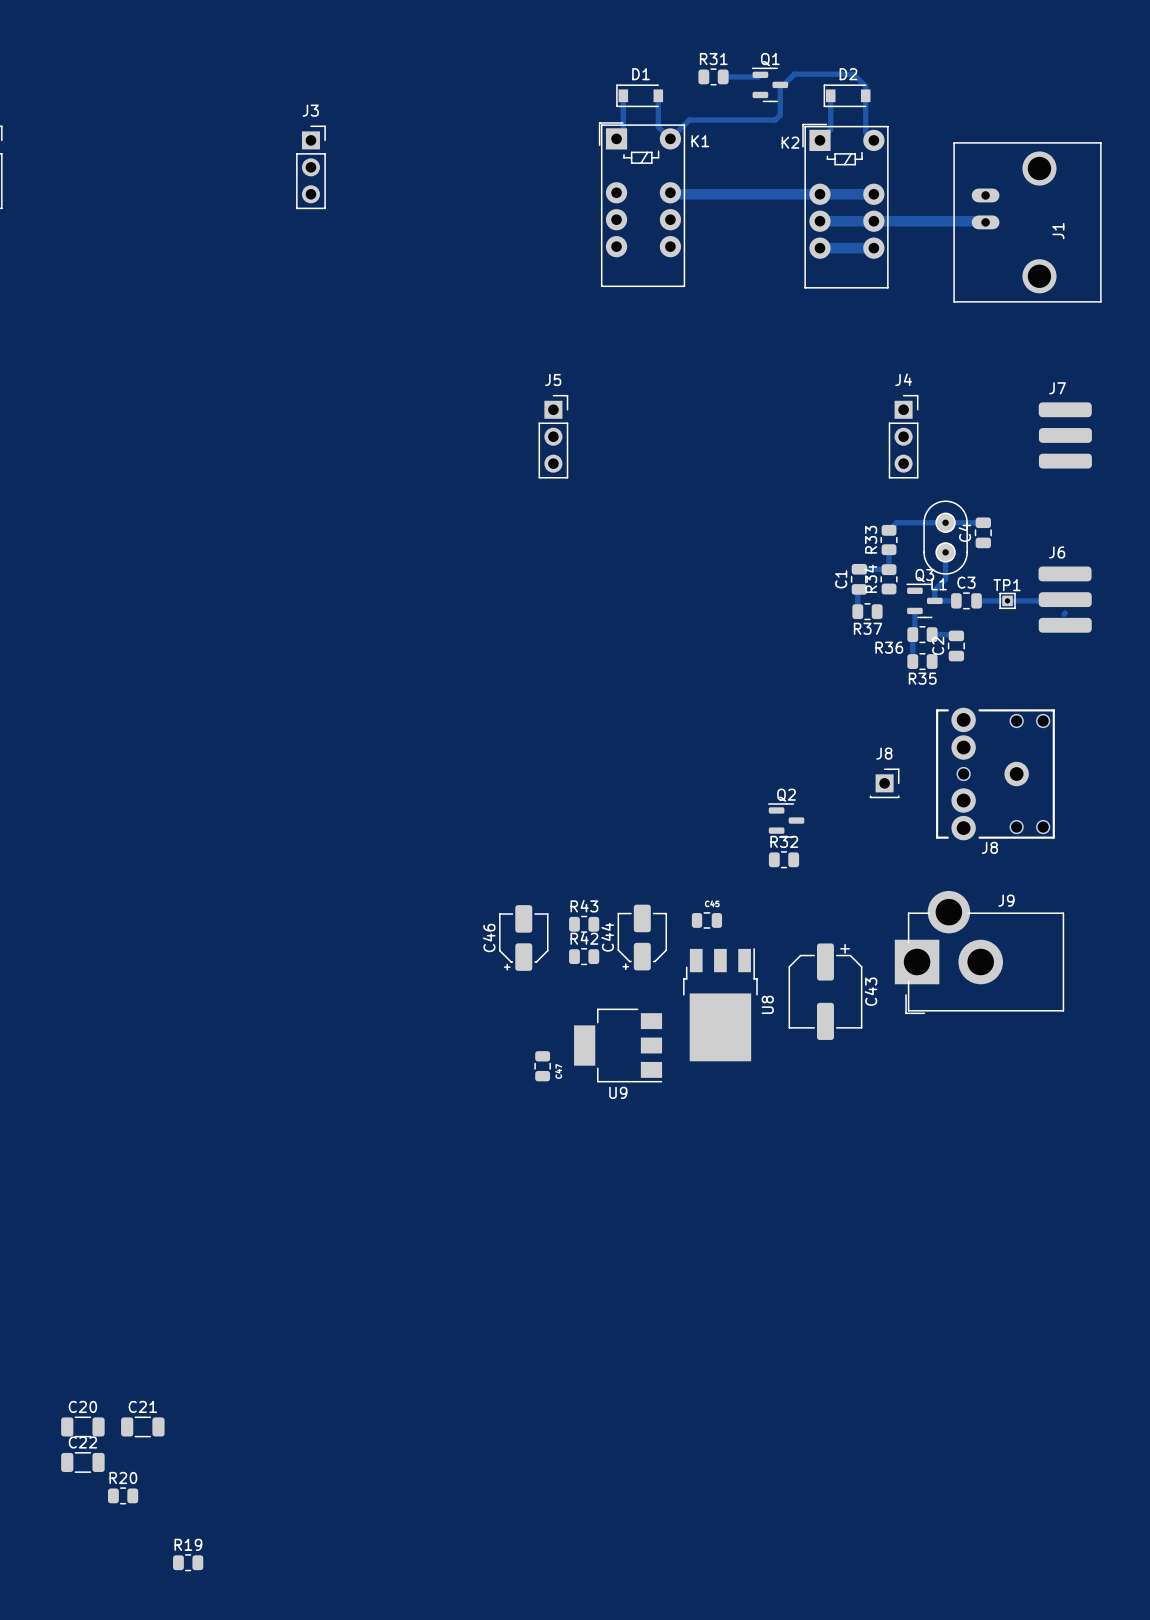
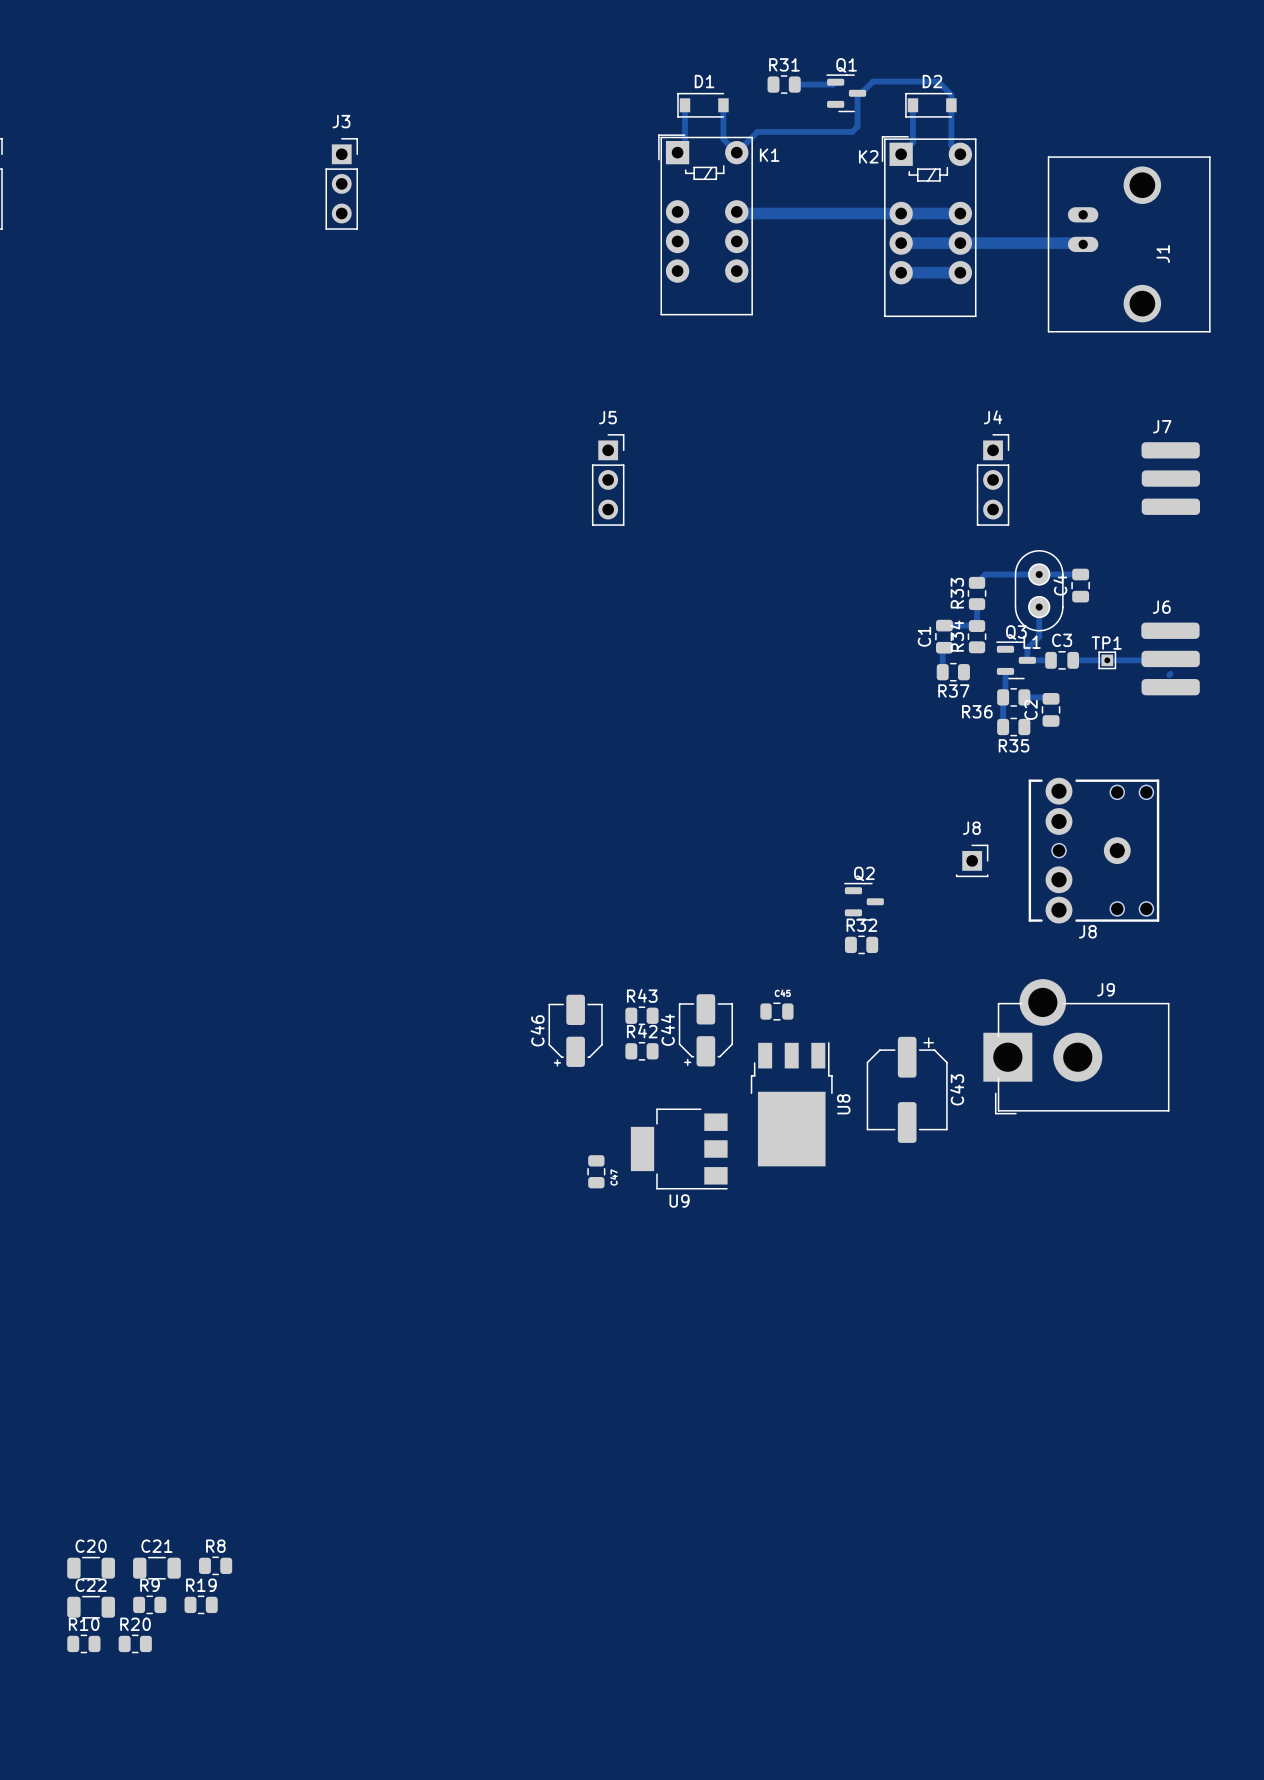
R8: none -> (215, 1565)
R9: none -> (149, 1604)
R10: none -> (83, 1643)
R19 position: (188, 1562) -> (201, 1604)

